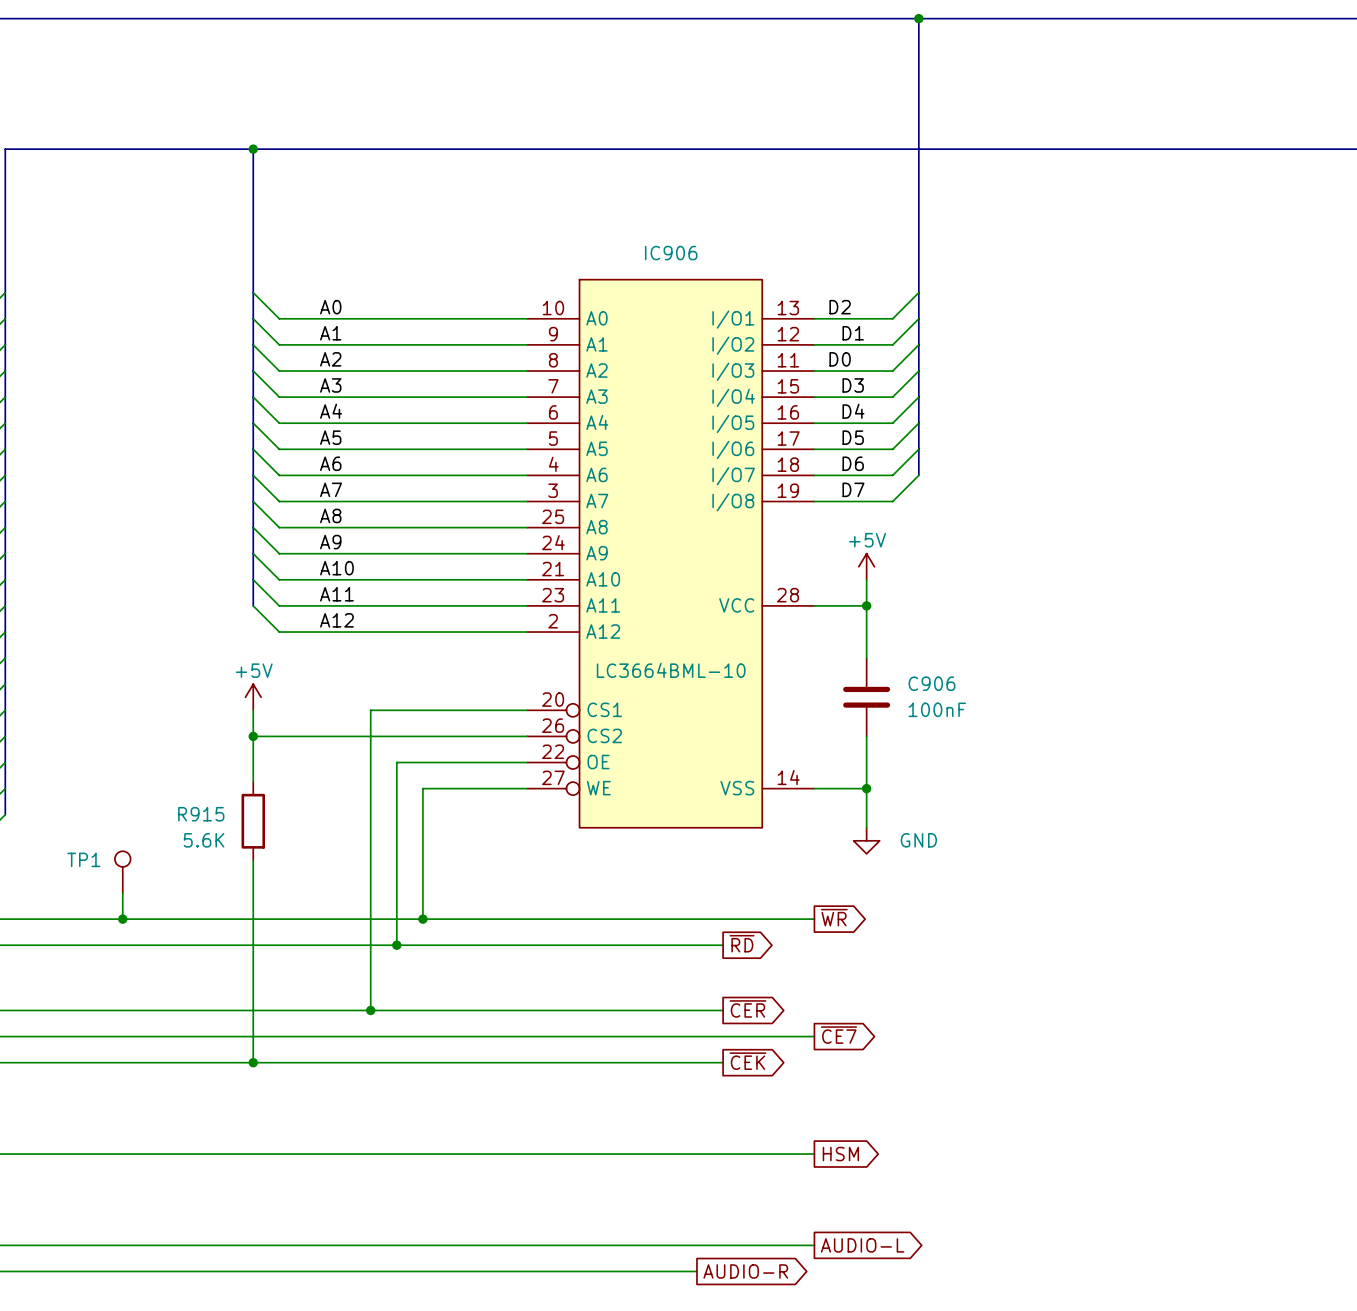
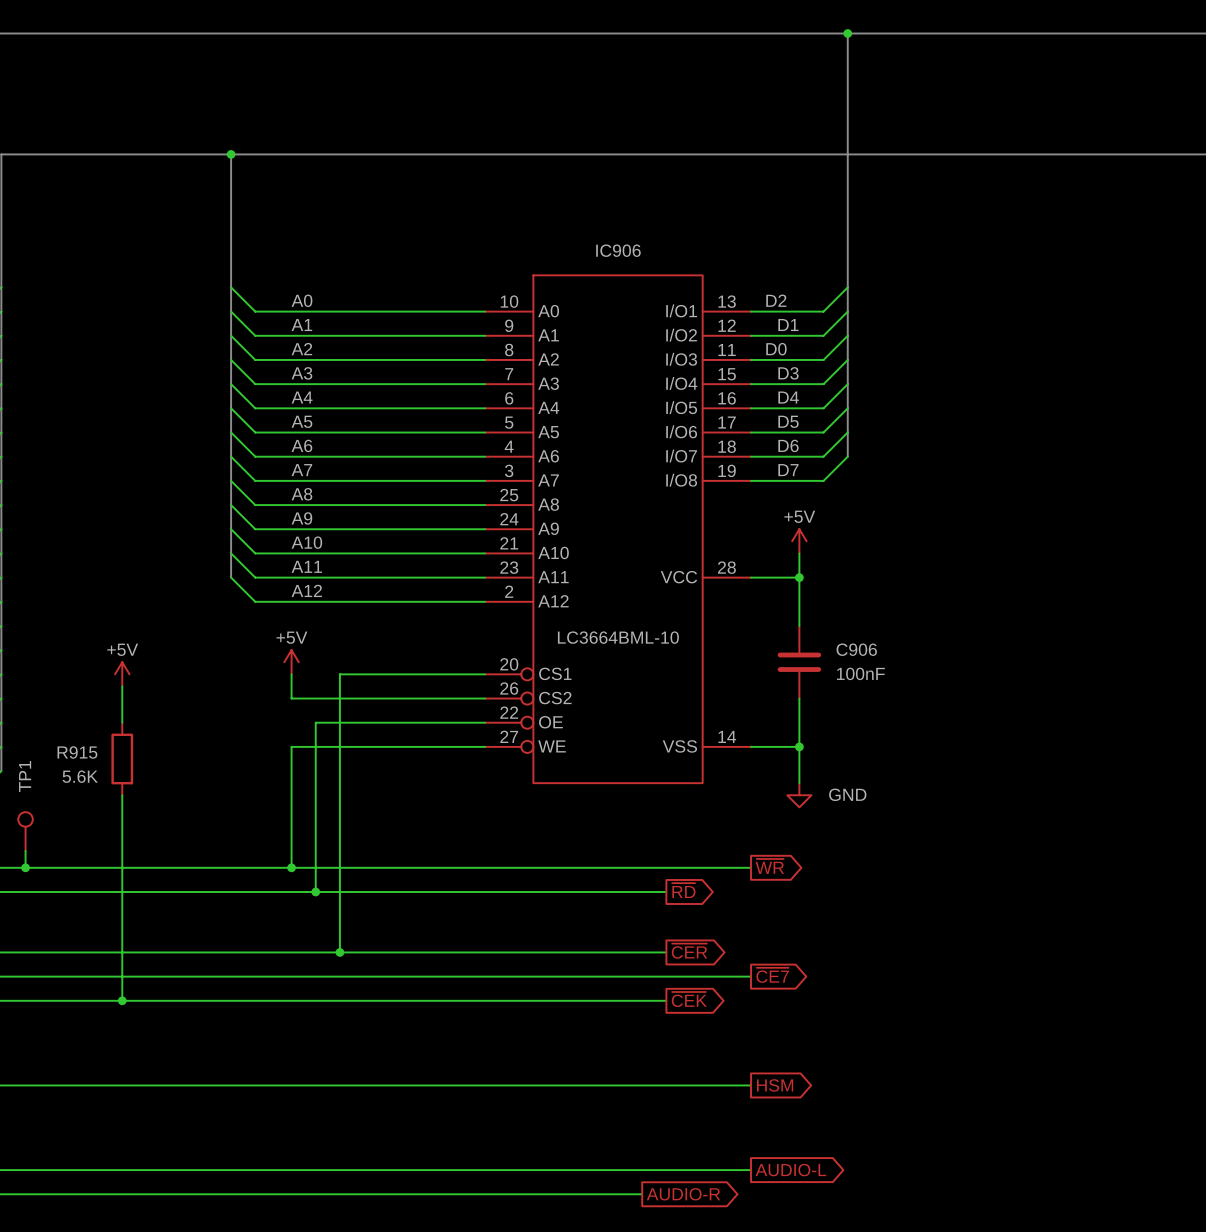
power symbol: +5V (253, 697) -> none
power symbol: none -> +5V (291, 662)
power symbol: none -> +5V (122, 674)
wire: (253, 710) (253, 782) -> none
wire: none -> (122, 686) (122, 722)
wire: (253, 736) (318, 736) -> (291, 674) (291, 698)
junction: (253, 736) -> none
wire: (396, 762) (396, 945) -> (364, 722) (315, 722) (315, 891)
wire: (422, 788) (422, 919) -> (388, 746) (291, 746) (291, 867)
R915 position: (253, 821) -> (122, 758)
wire: none -> (122, 795) (122, 1000)
TP1 name rotation: 0° (83, 859) -> 90° counterclockwise (25, 776)
TP1 name position: TP1 (83, 859) -> TP1 (25, 776)
wire: (253, 860) (253, 1062) -> none
TP1 position: (122, 872) -> (25, 831)
wire: (122, 893) (122, 919) -> none
wire: none -> (25, 850) (25, 867)
junction: none -> (25, 867)
junction: (122, 919) -> none
junction: none -> (291, 867)
junction: (422, 919) -> none
junction: none -> (315, 891)
junction: (396, 945) -> none
junction: none -> (122, 1000)
junction: (253, 1062) -> none

